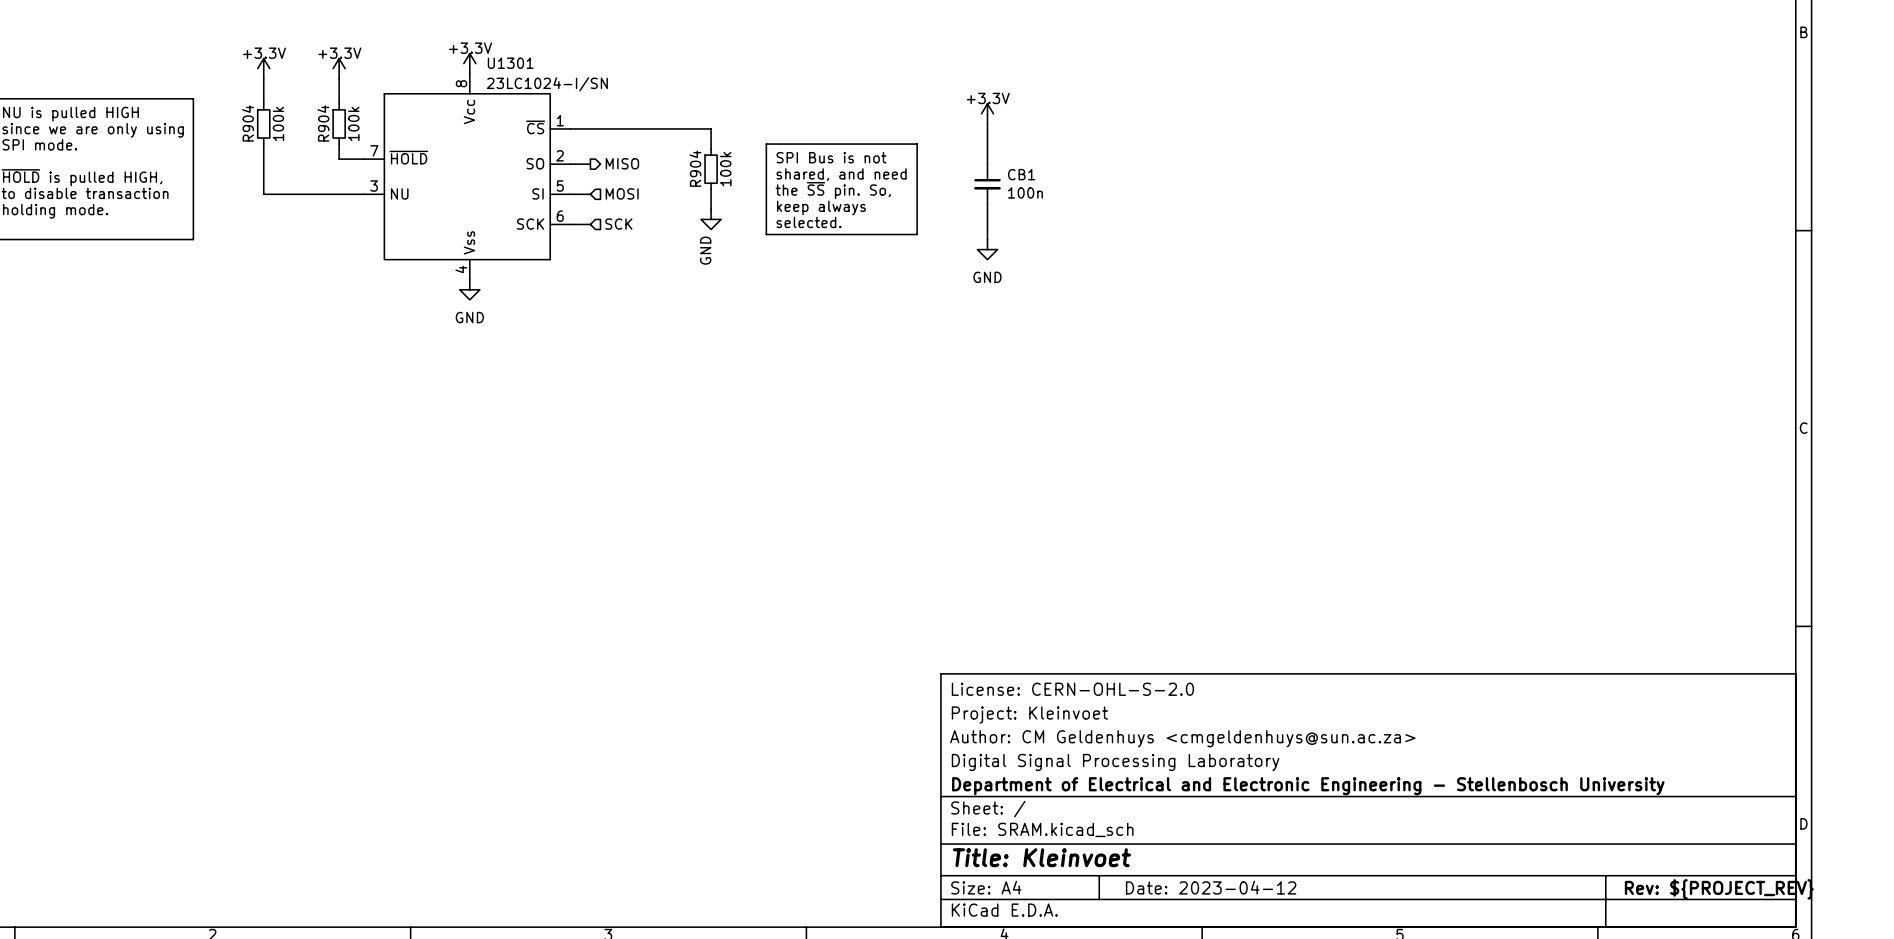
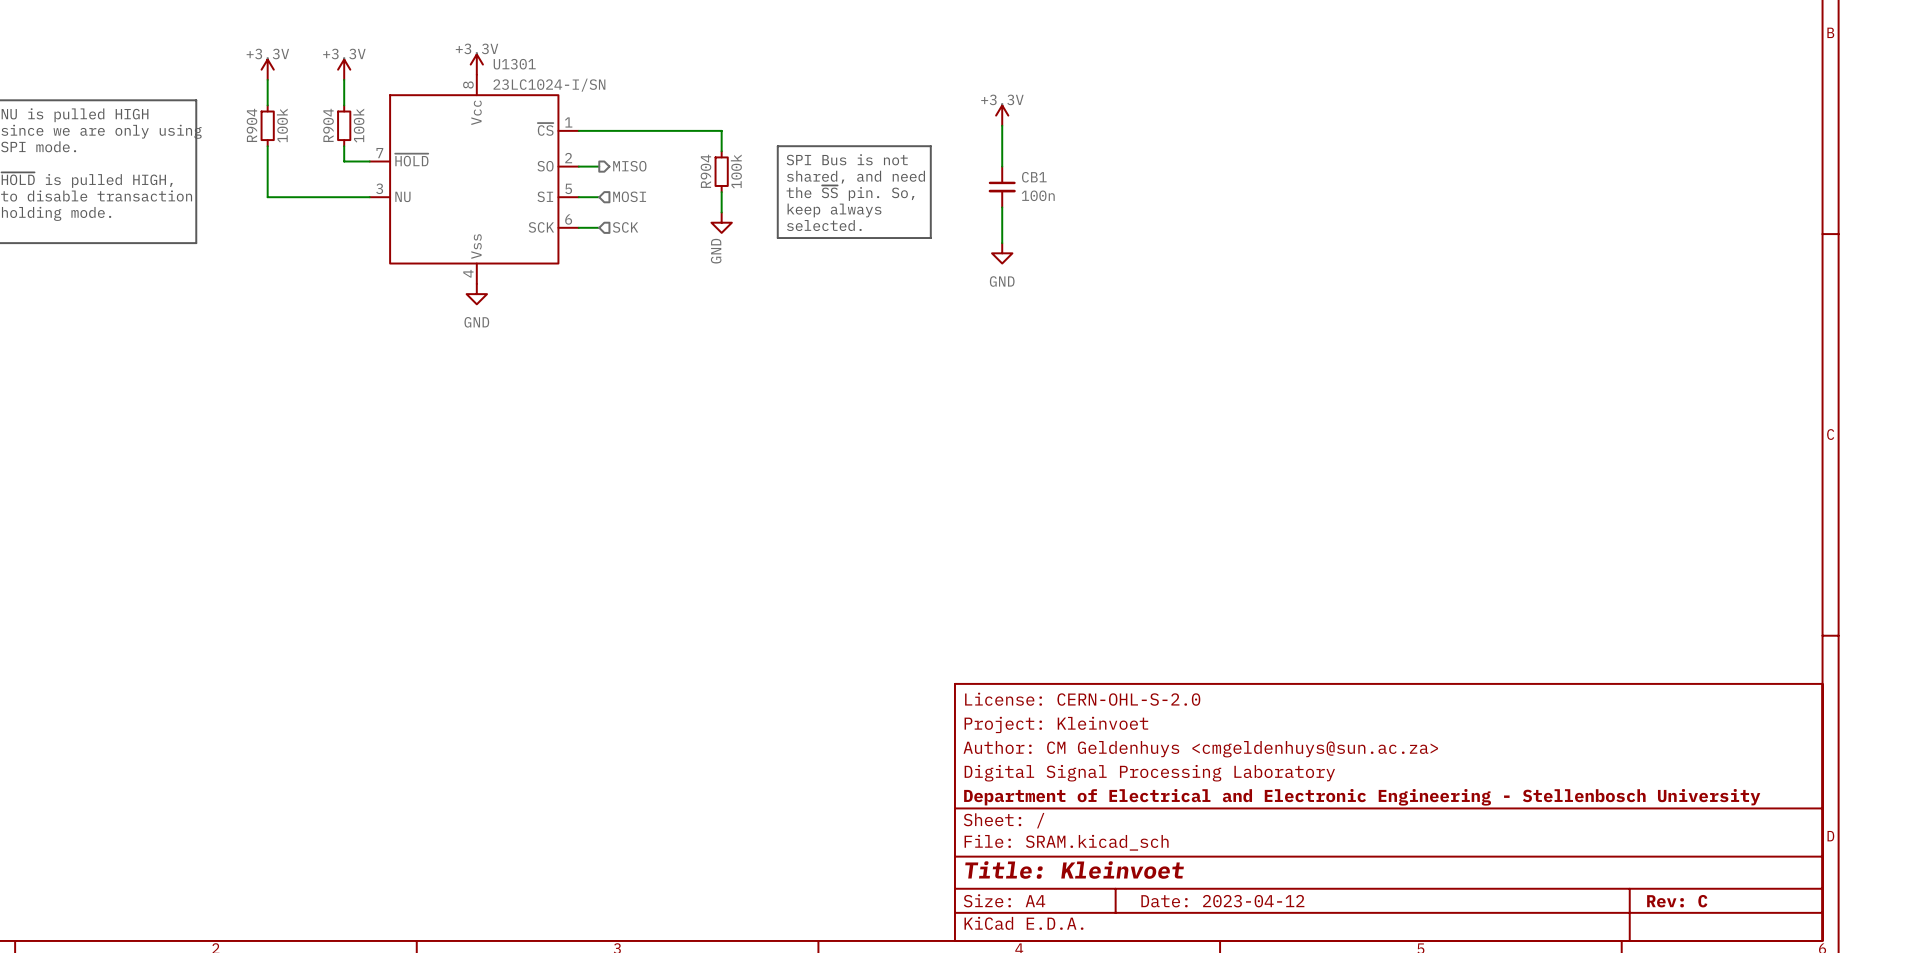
title block: Rev: ${PROJECT_REV} (1719, 889) -> Rev: C (1677, 901)

